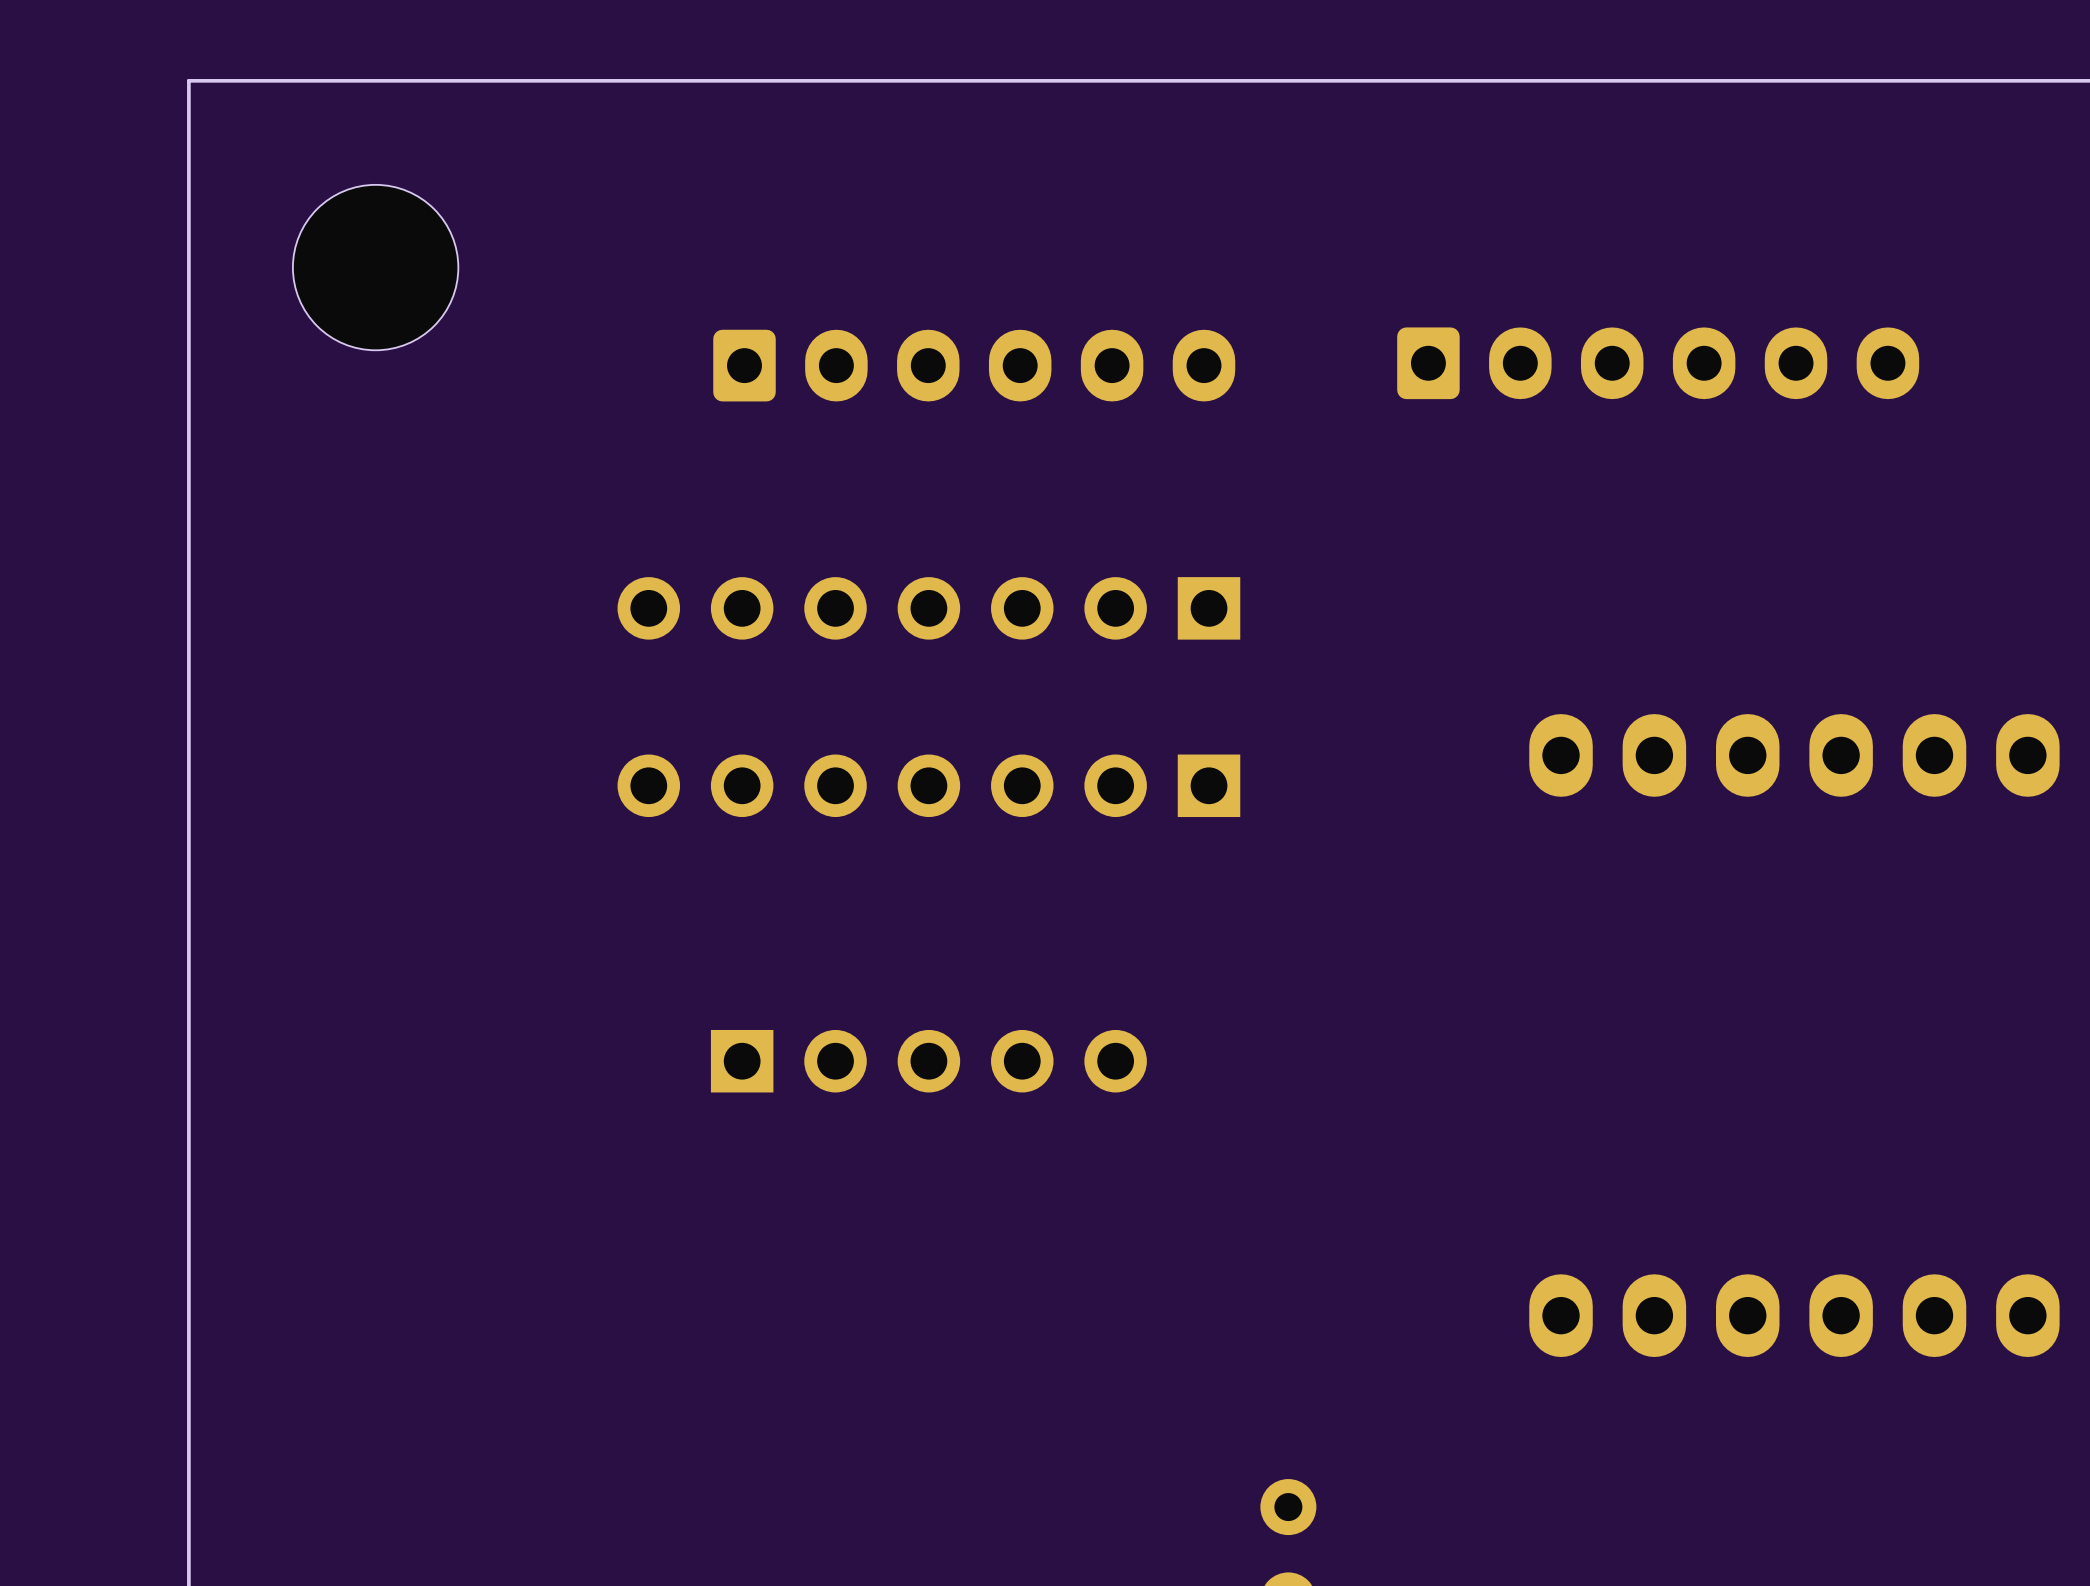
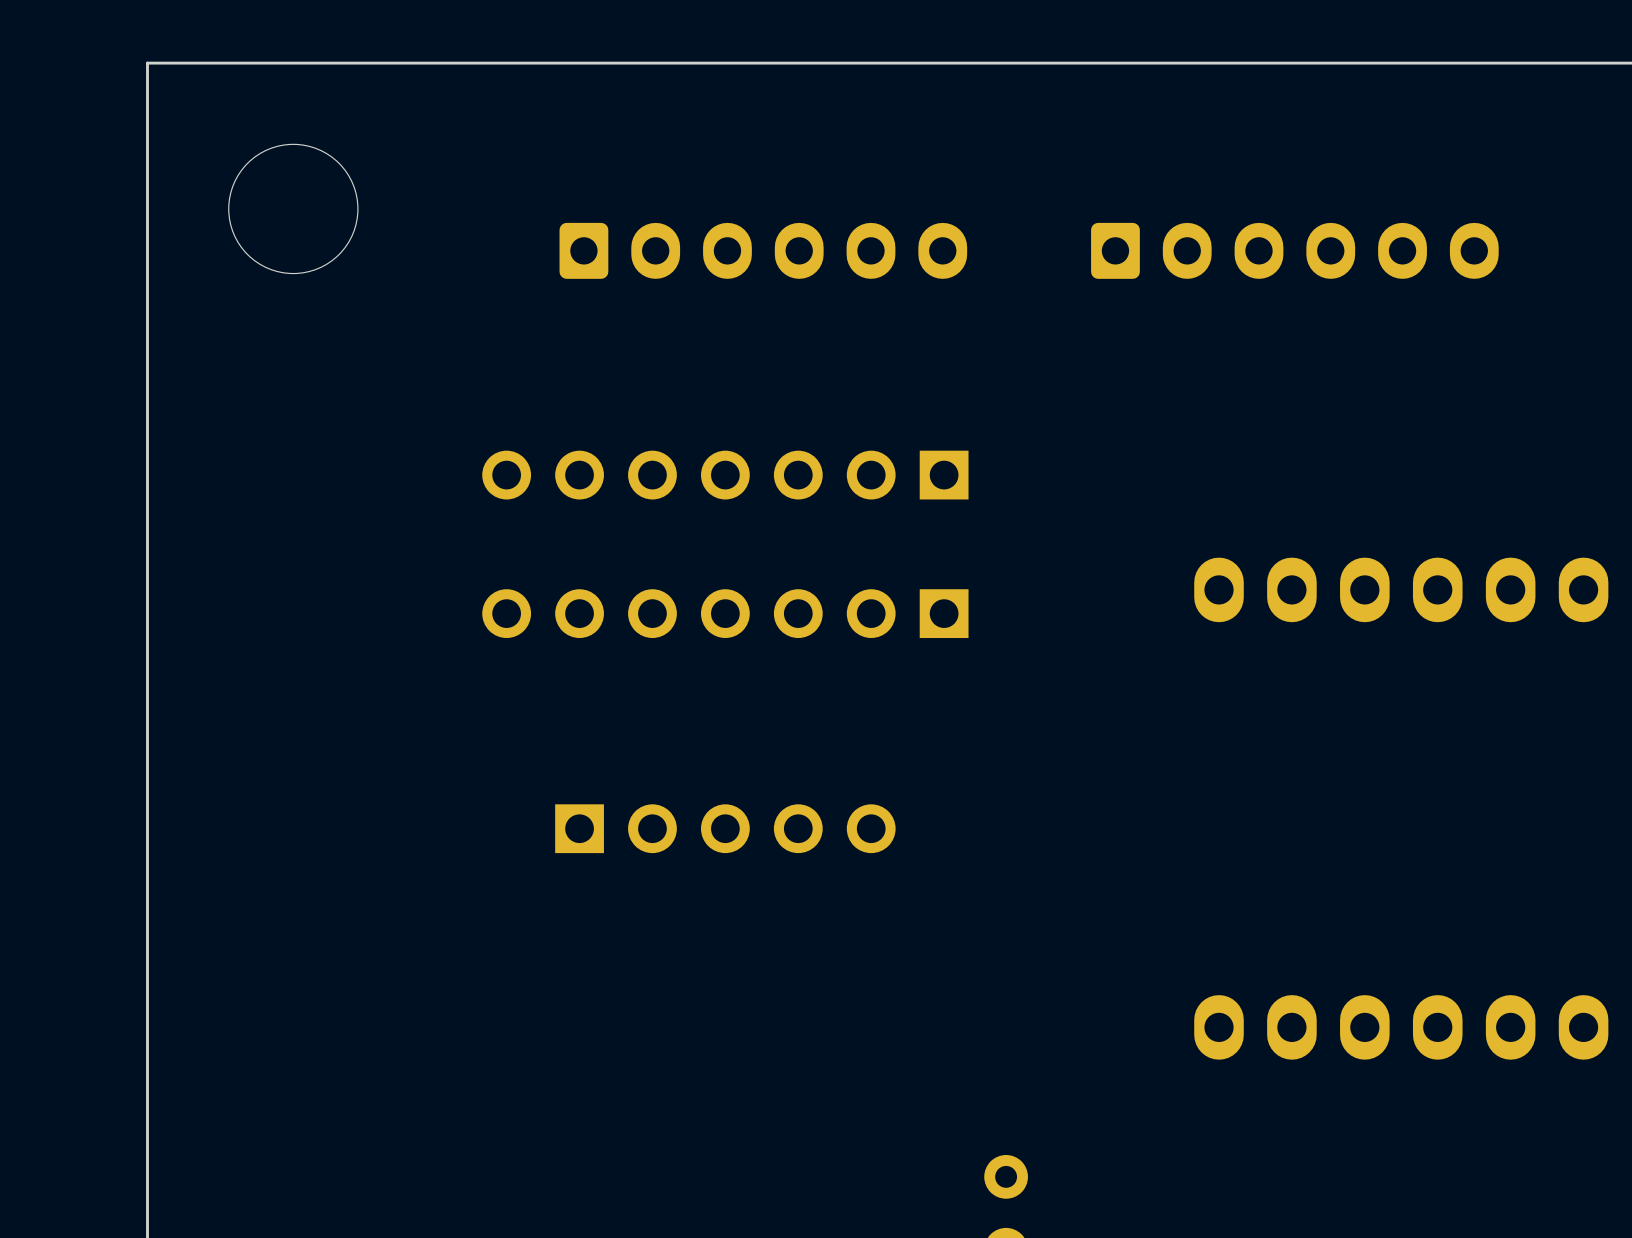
part position: (1658, 363) -> (1294, 250)
part position: (974, 365) -> (763, 250)

